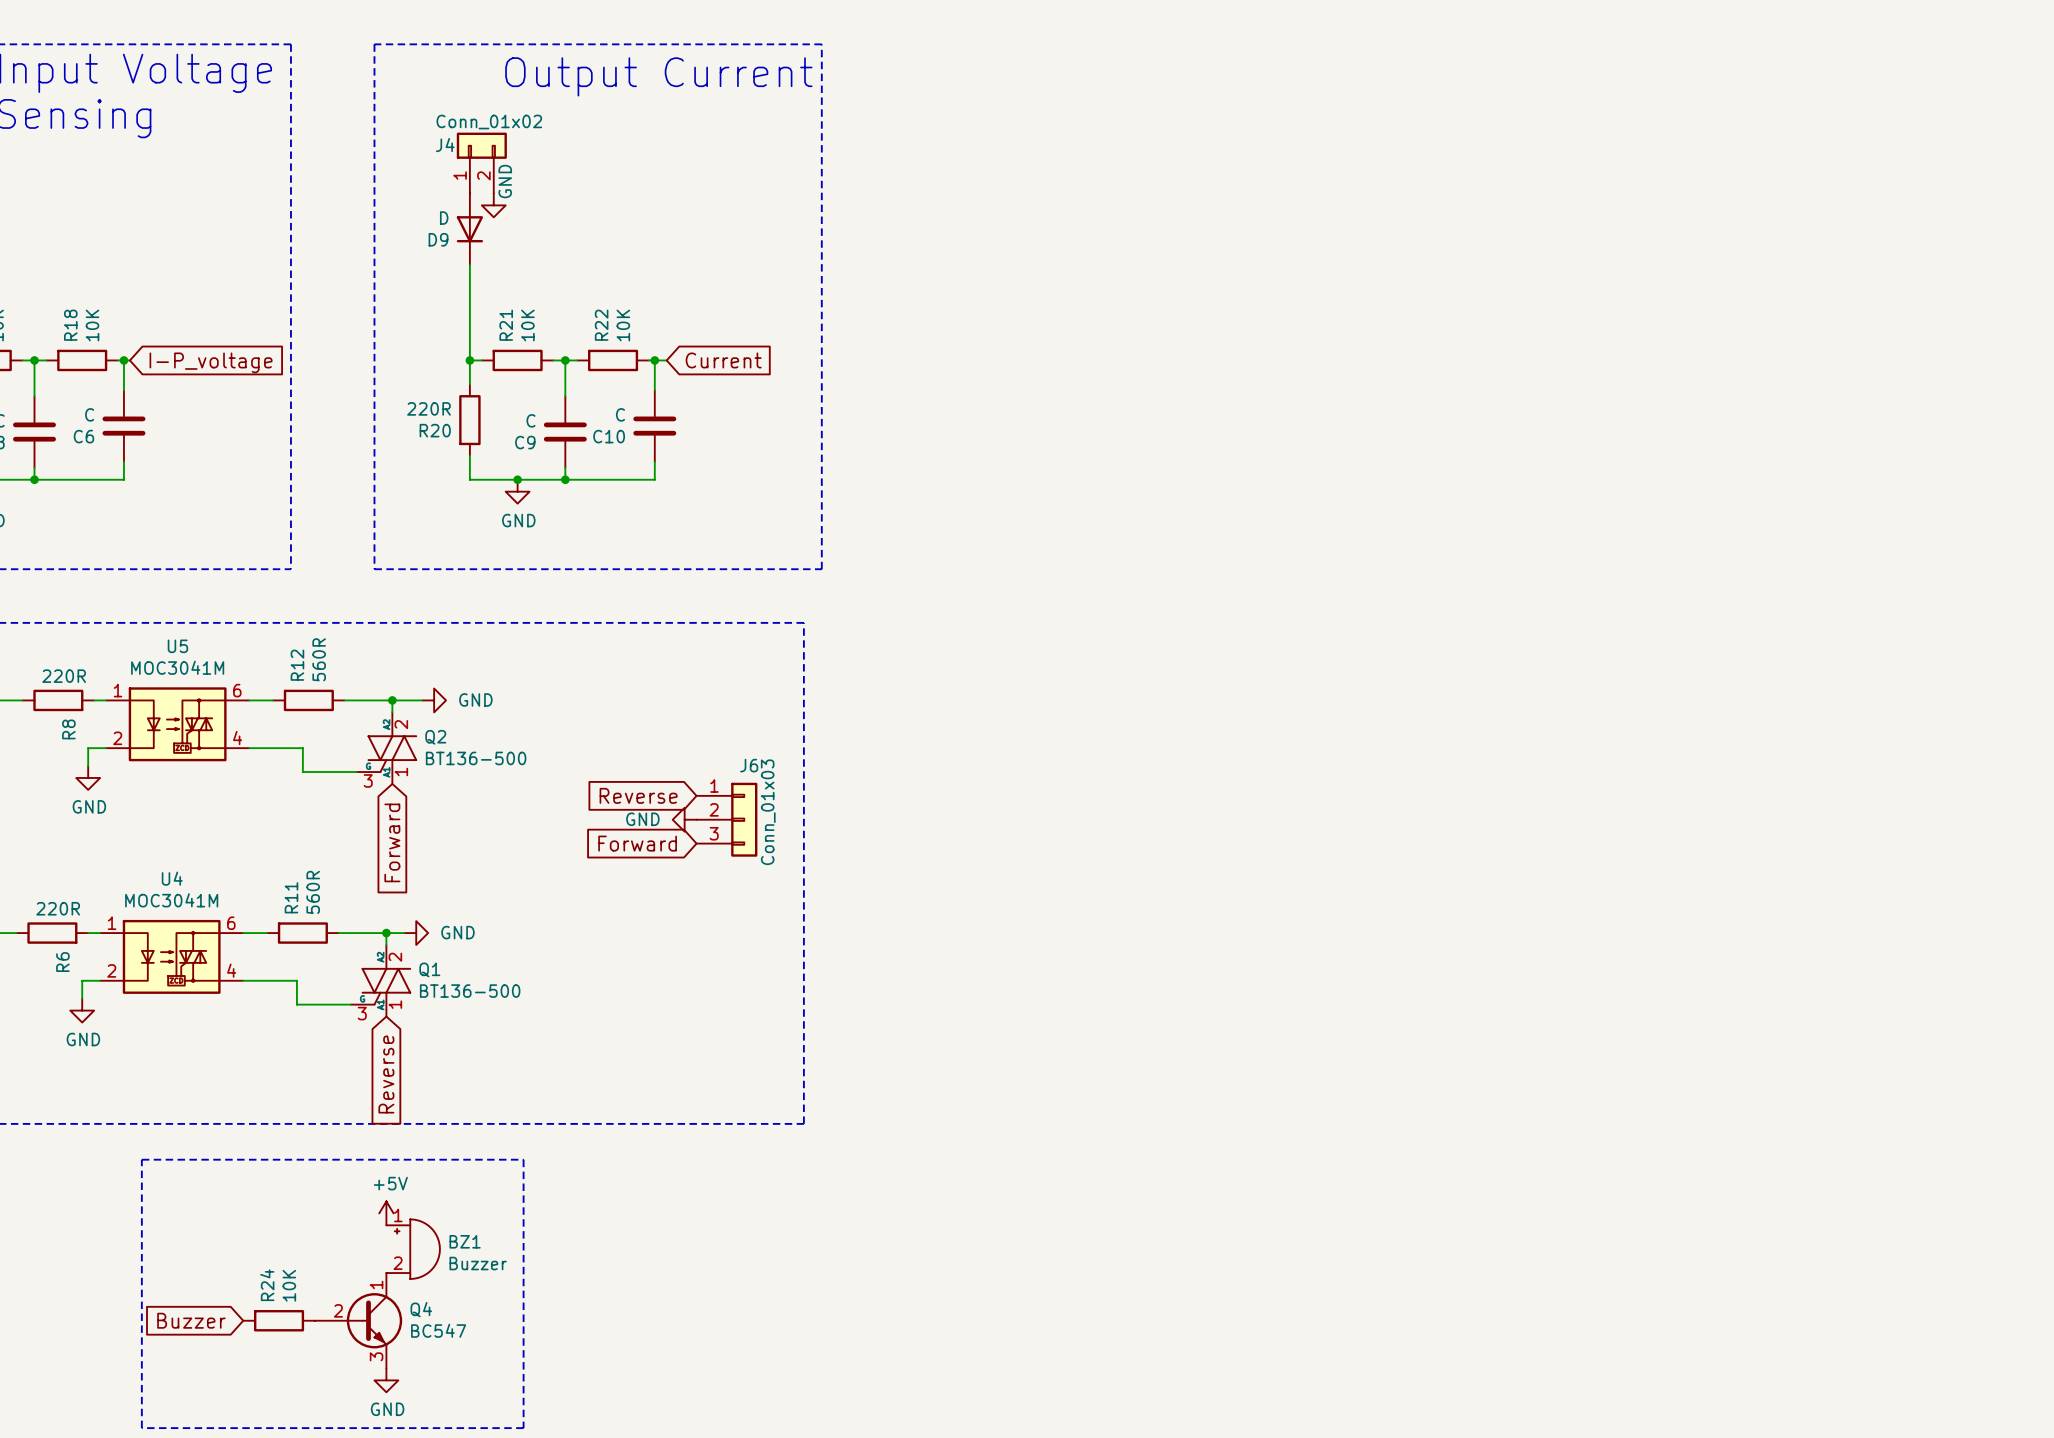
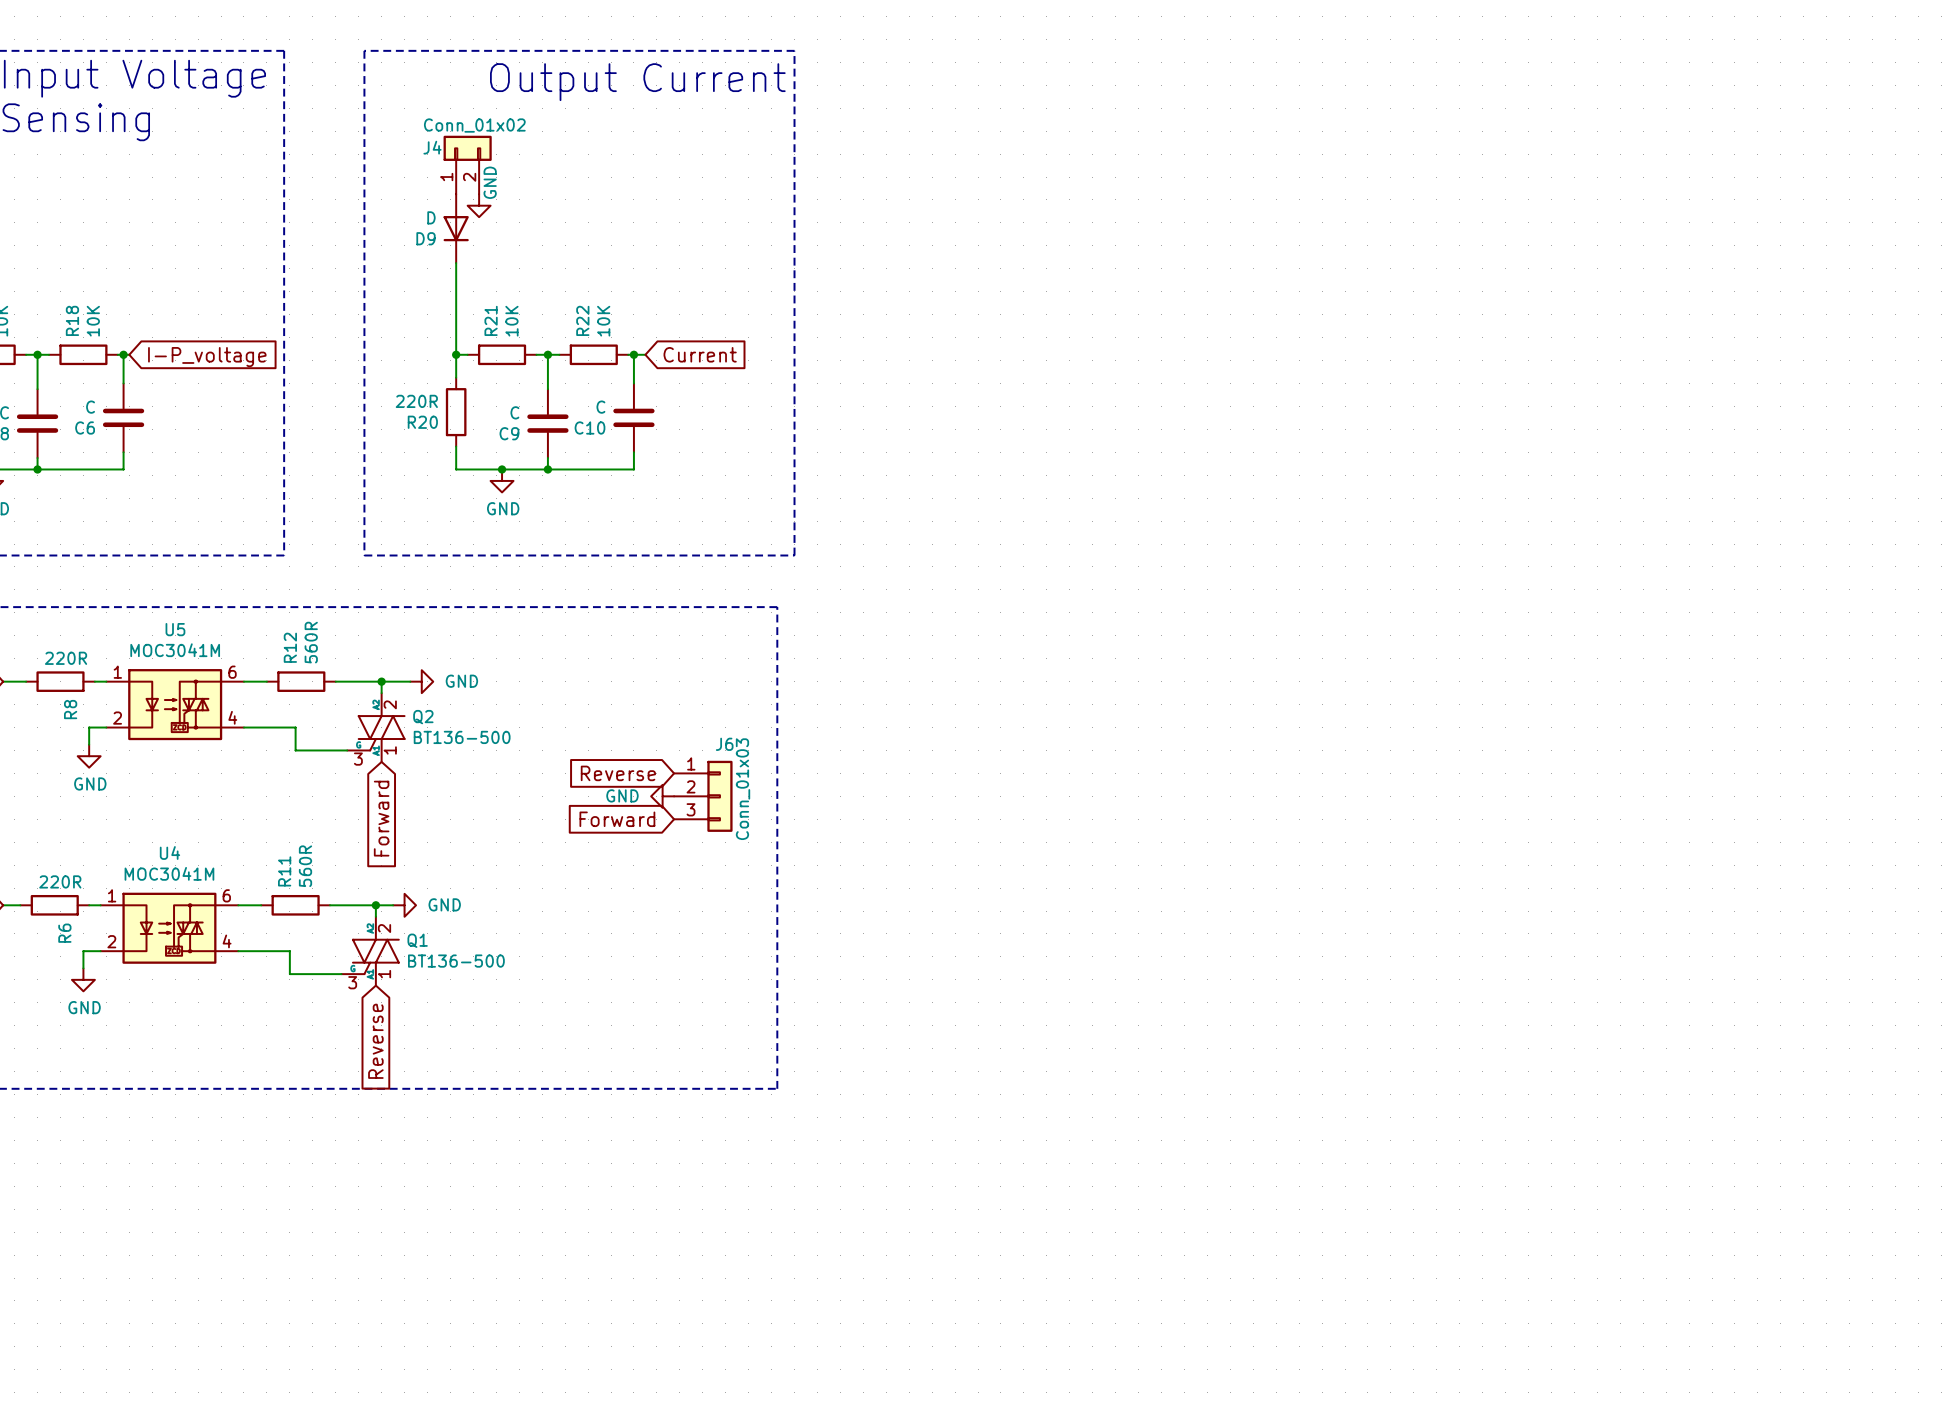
line: (141, 1159) (523, 1159) (523, 1428) (141, 1428) (141, 1159) -> none
power symbol: +5V (386, 1213) -> none
BZ1: Buzzer (413, 1249) -> none
global label: Buzzer (191, 1320) -> none
R24: 10K (279, 1320) -> none
Q4: BC547 (358, 1320) -> none
power symbol: GND (386, 1380) -> none

